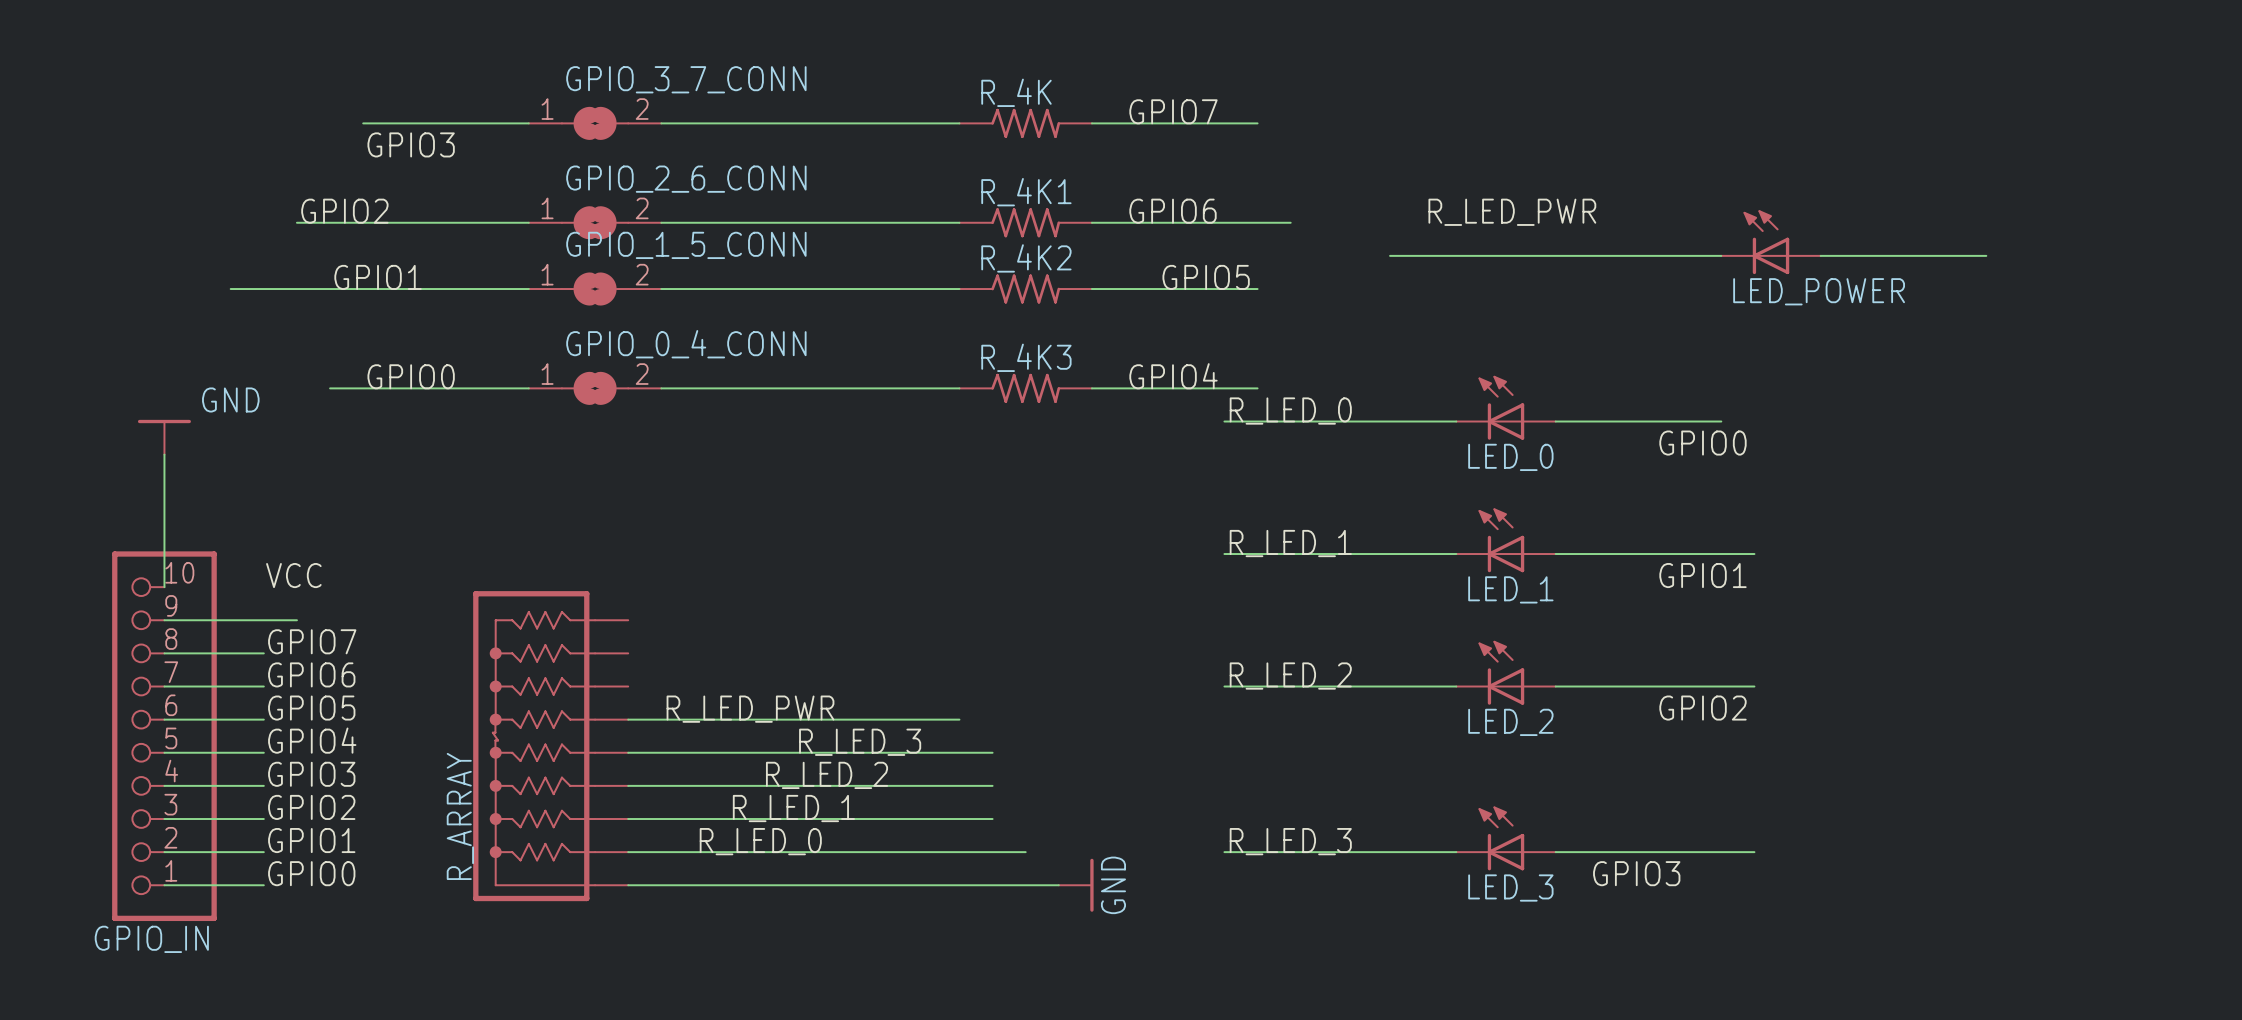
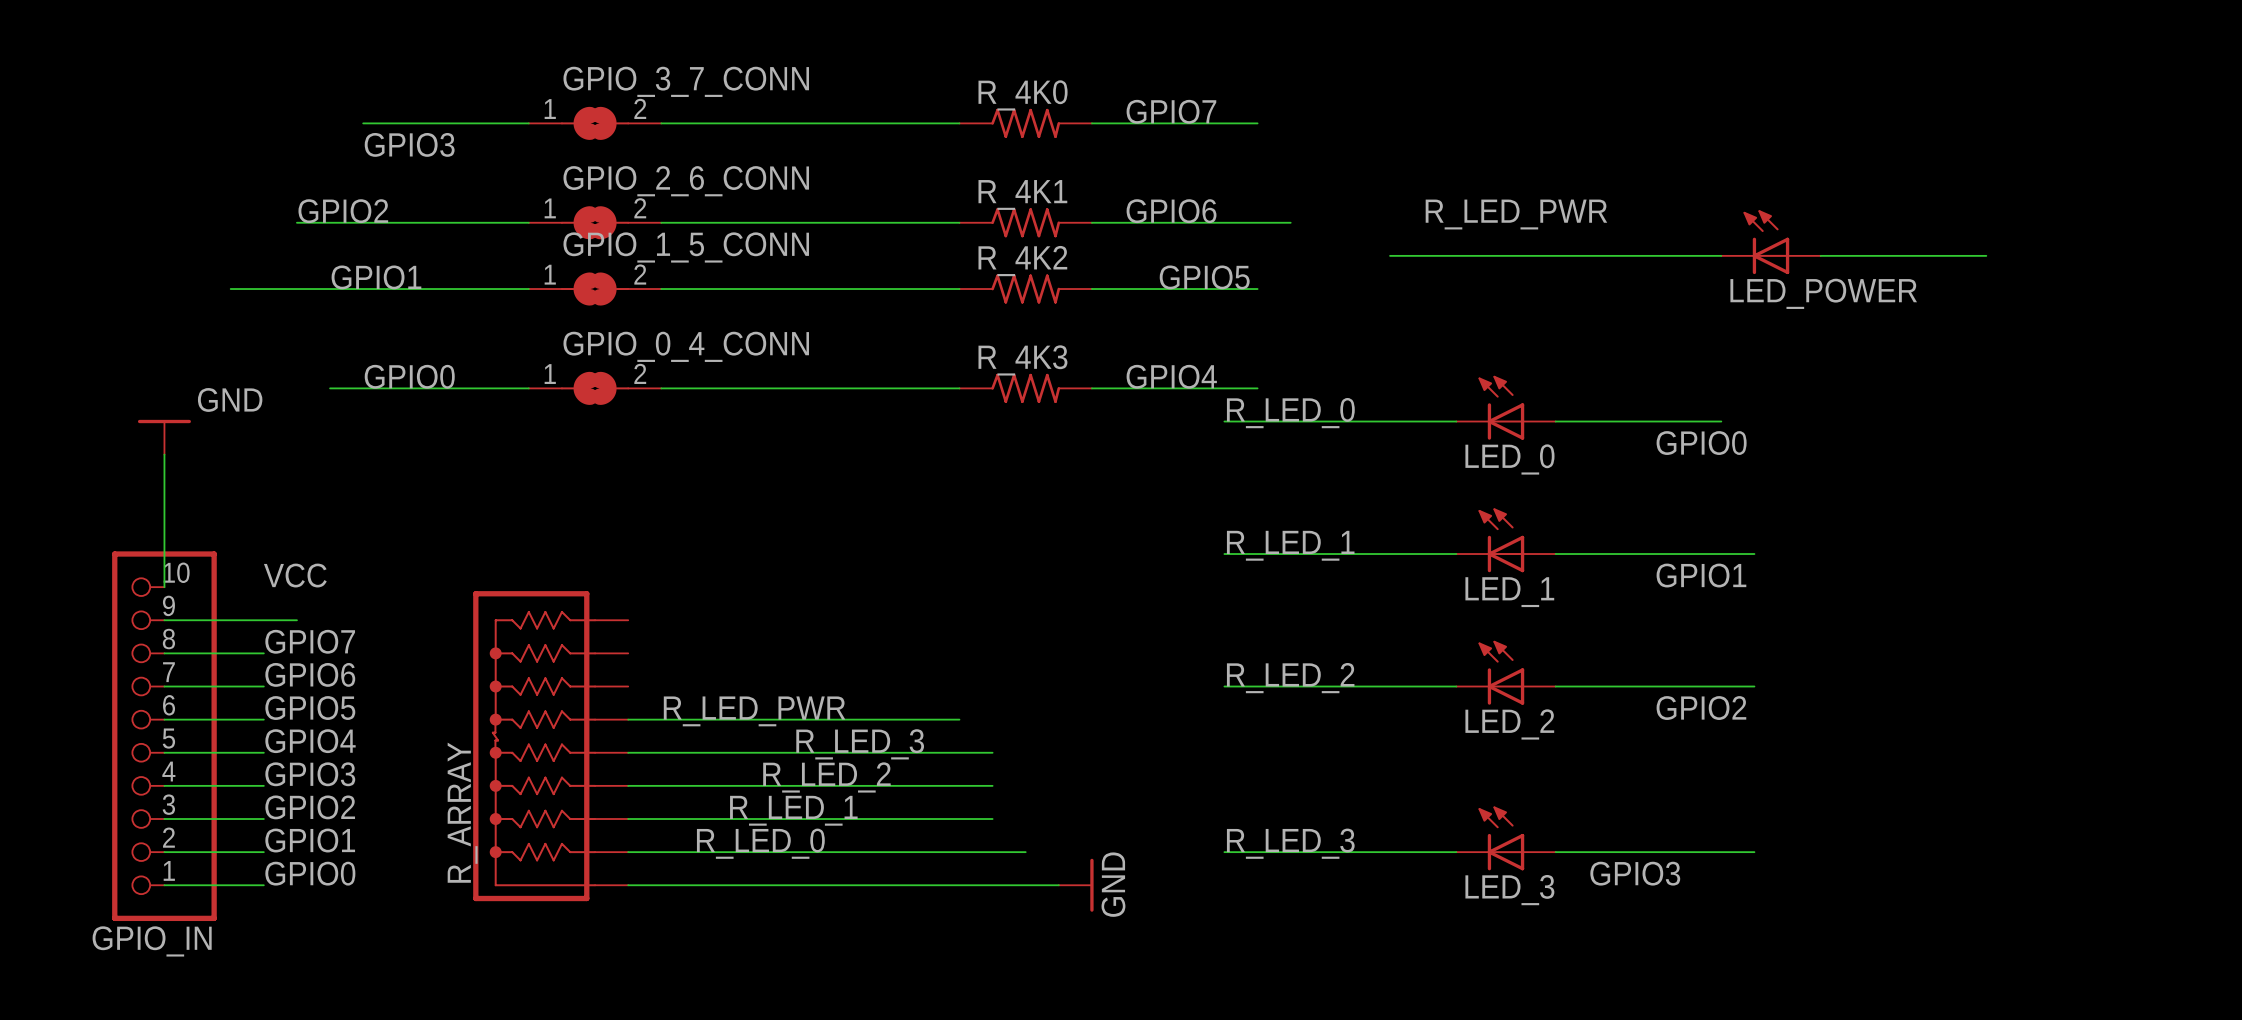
R_4K name: R_4K (1016, 92) -> R_4K0 (1023, 95)

